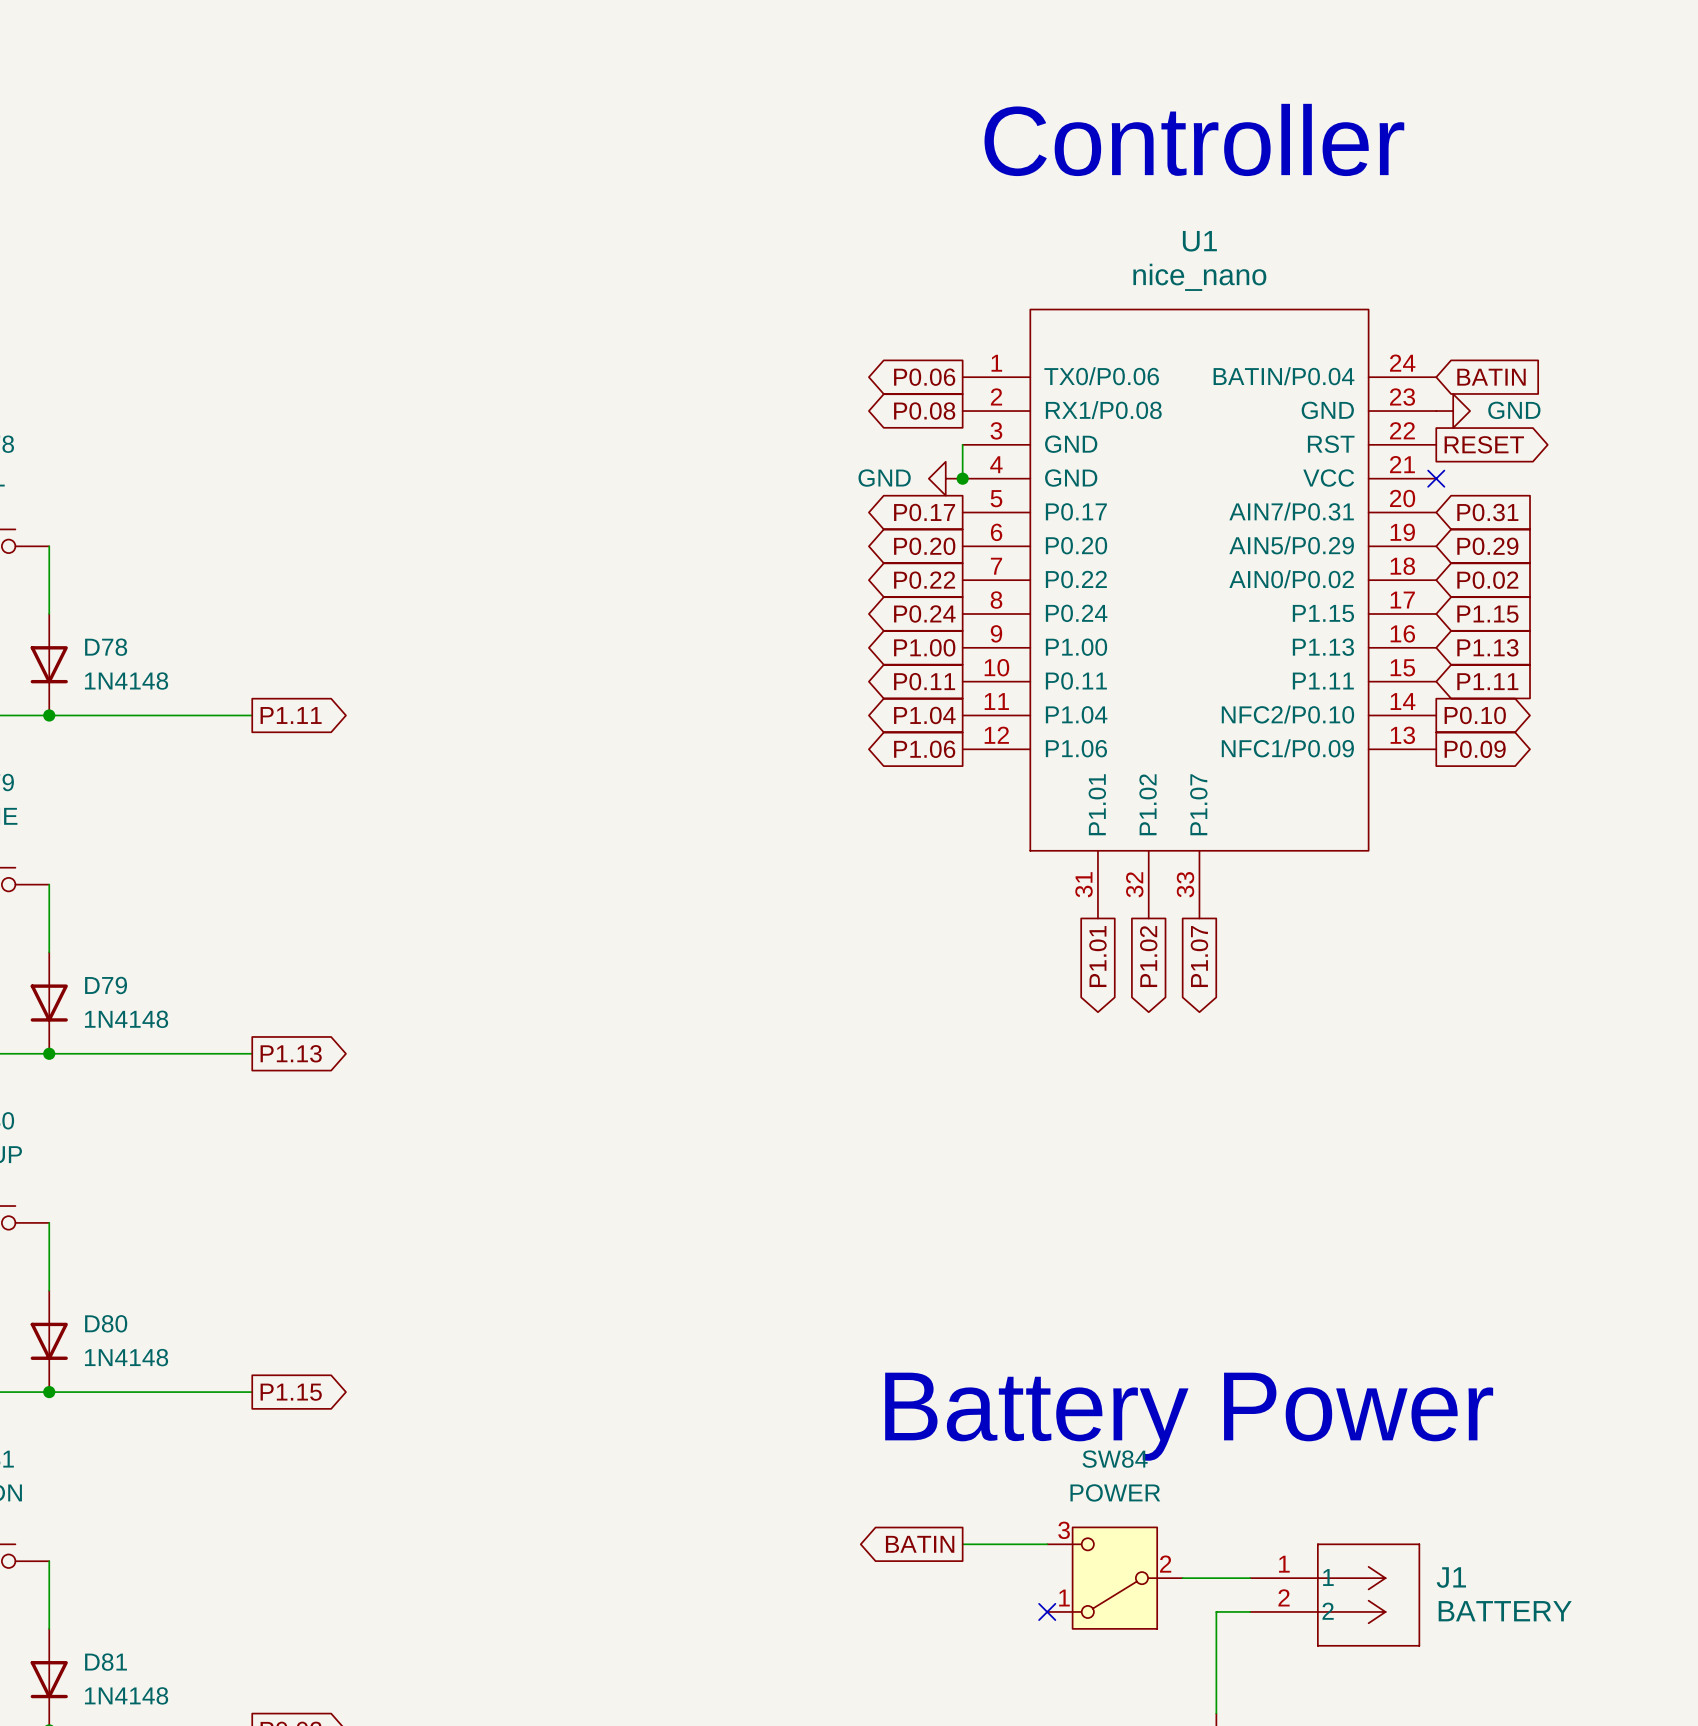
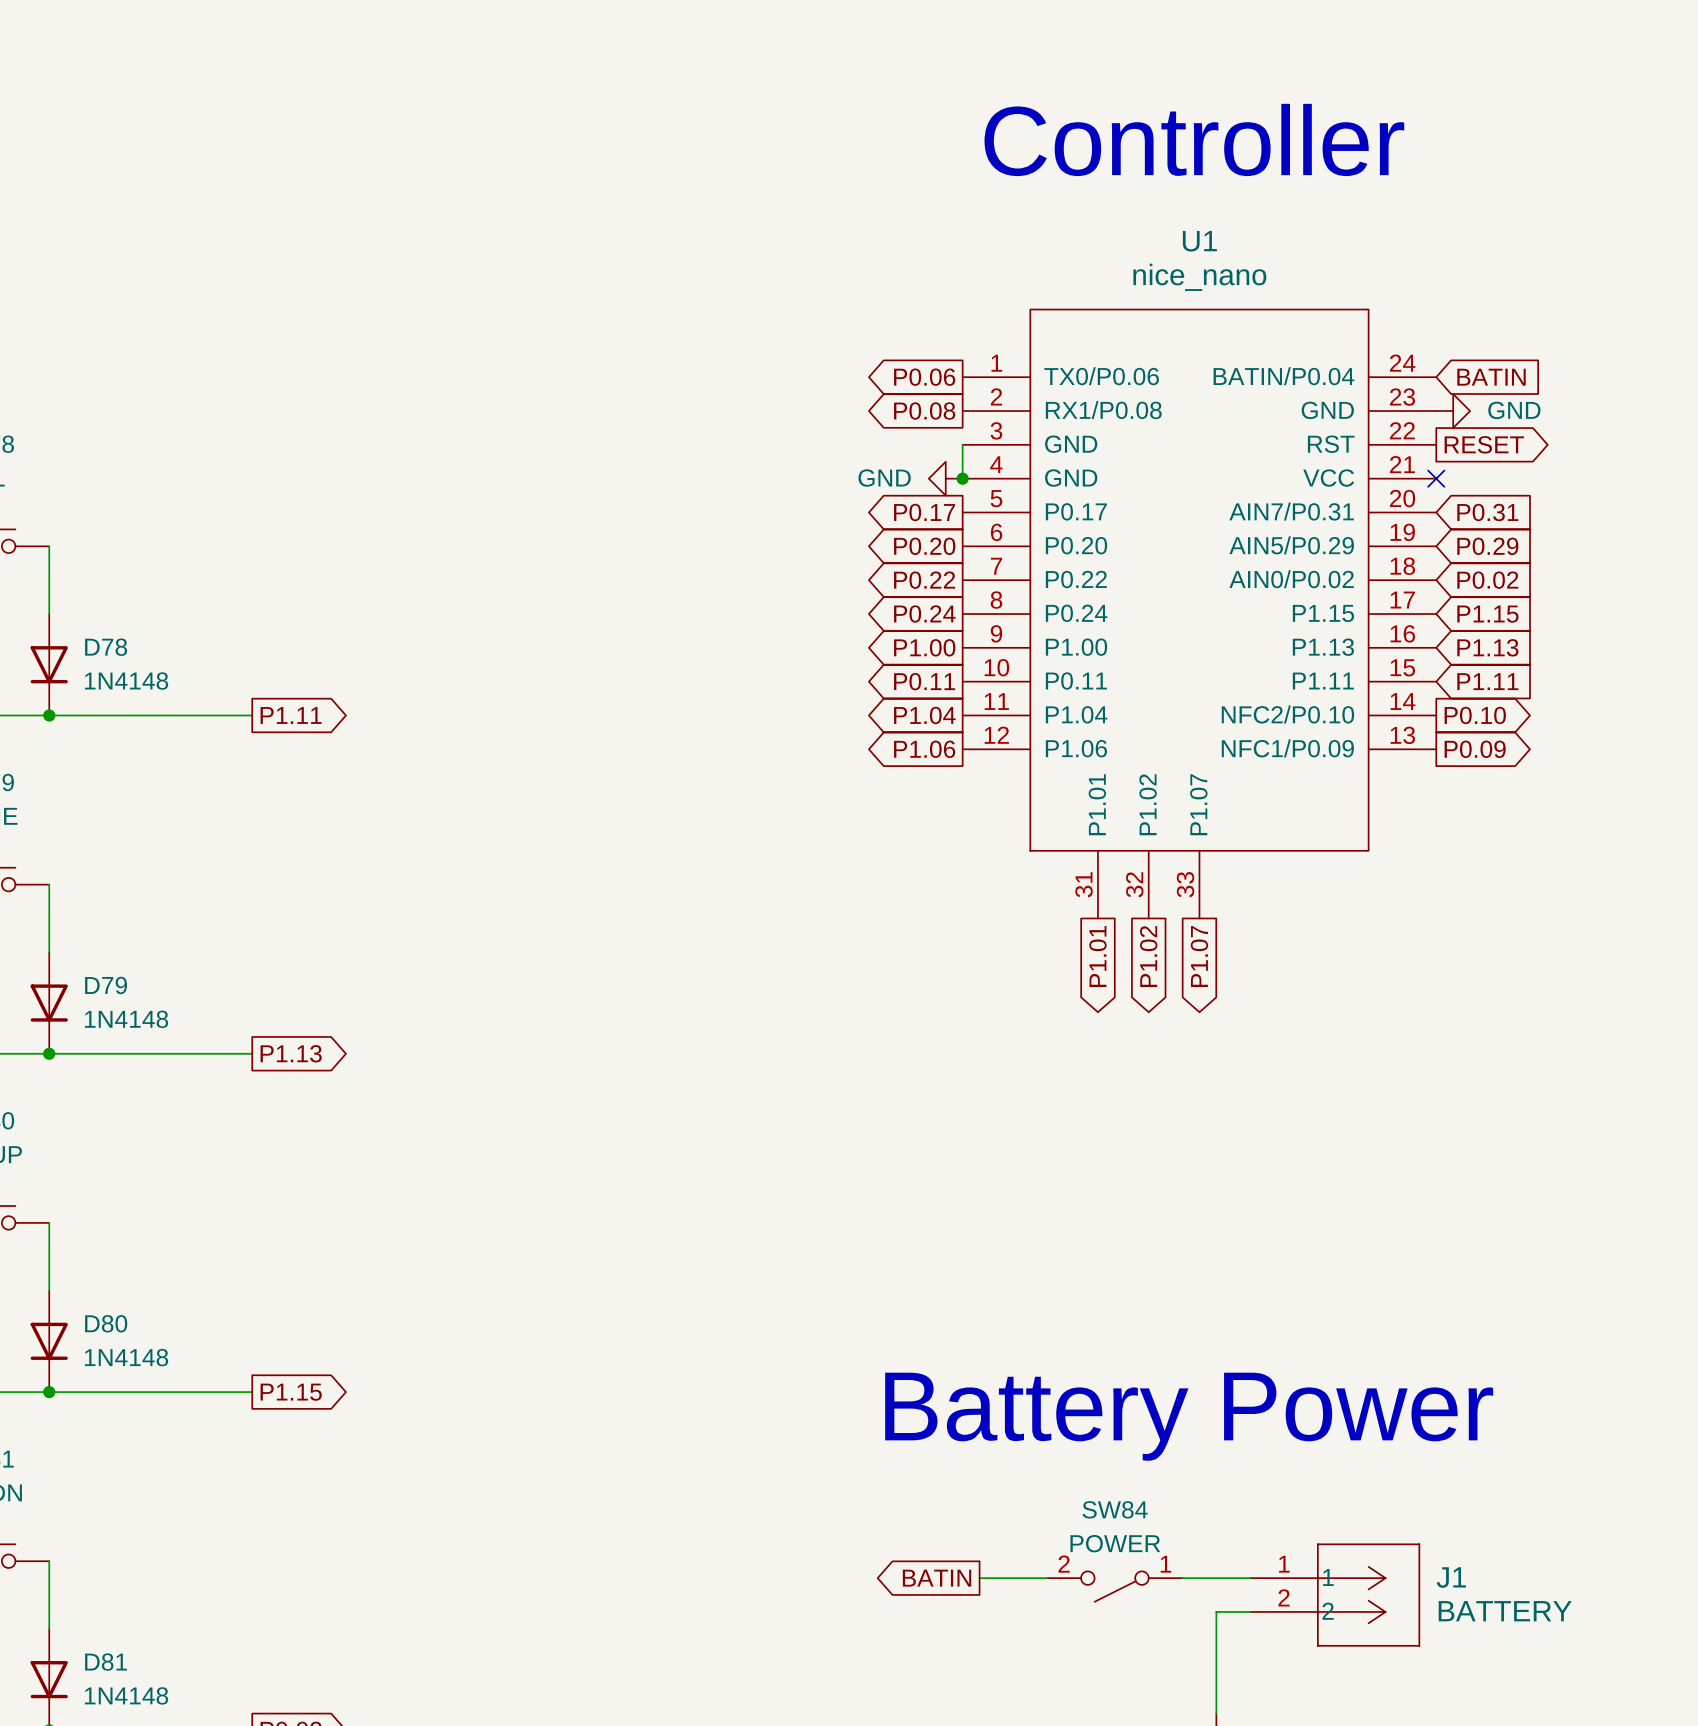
SW84 name position: SW84 (1115, 1459) -> SW84 (1115, 1509)
SW84 value position: POWER (1115, 1492) -> POWER (1115, 1543)
SW84 symbol: [1047, 1527, 1183, 1629] -> [1047, 1571, 1183, 1602]
global label position: BATIN (920, 1544) -> BATIN (937, 1578)
wire: (962, 1544) (1047, 1544) -> none
wire: none -> (979, 1578) (1047, 1578)
no-connect mark: (1047, 1611) -> none

